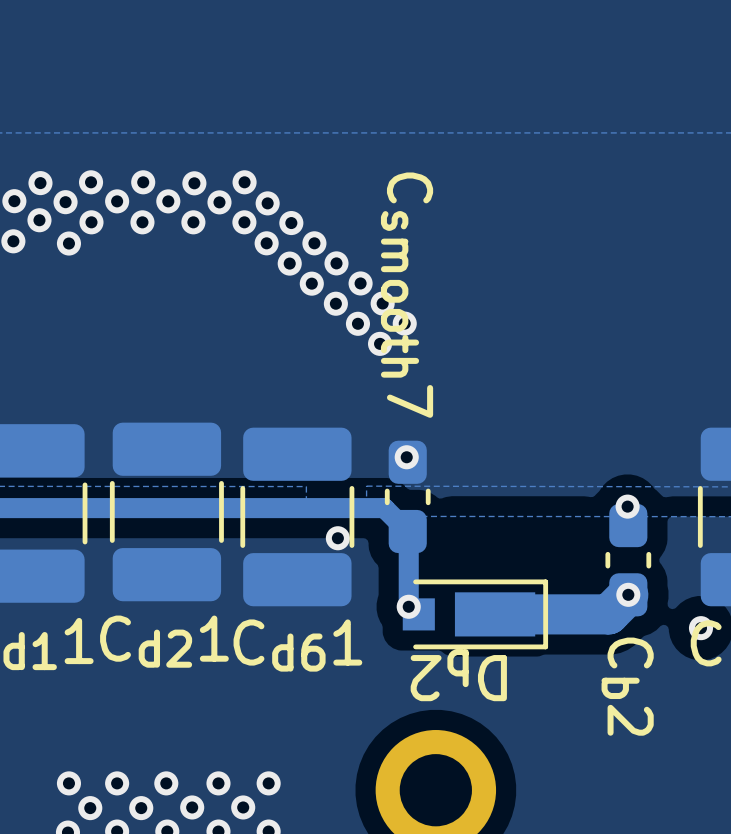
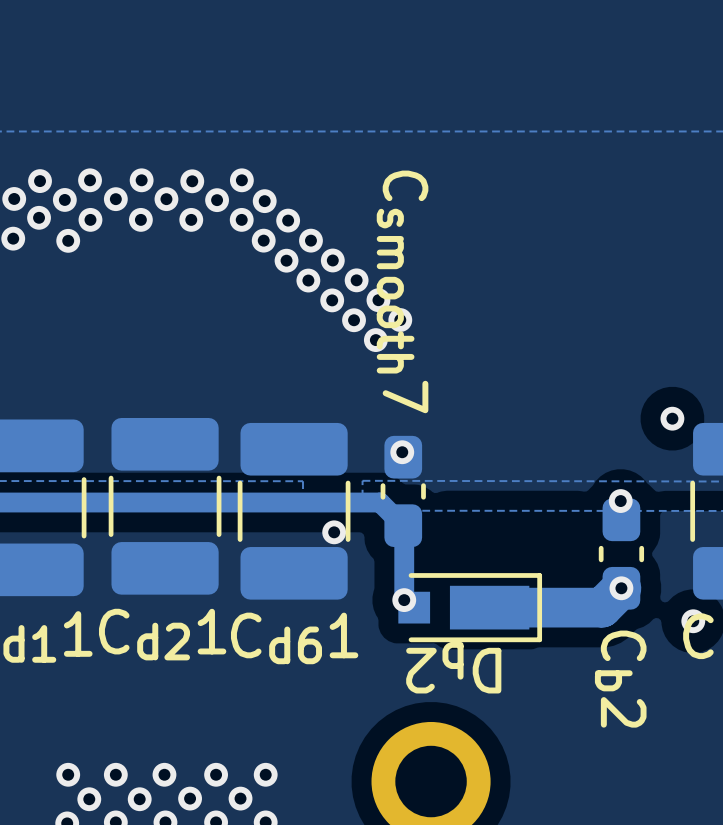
via: none -> (672, 418)

